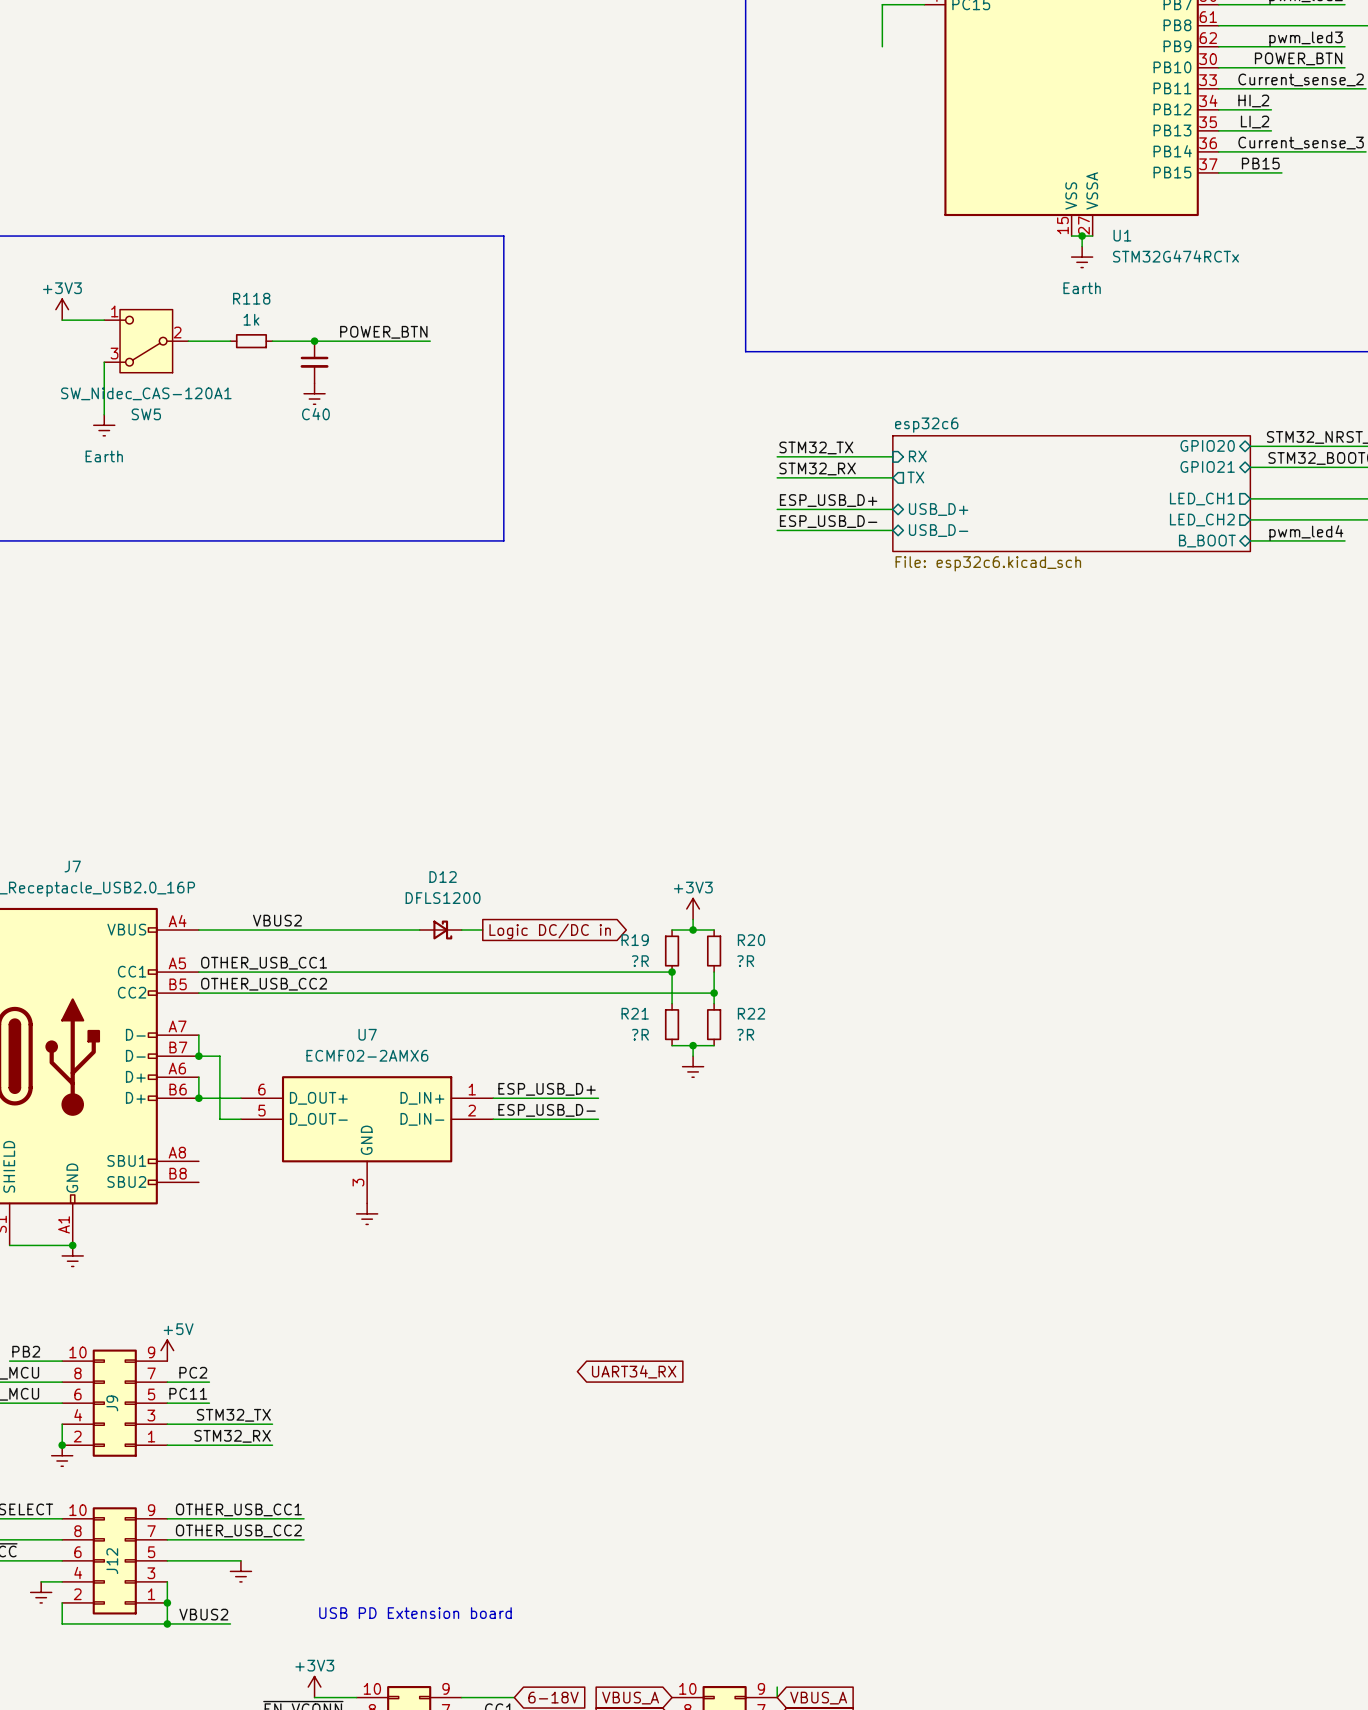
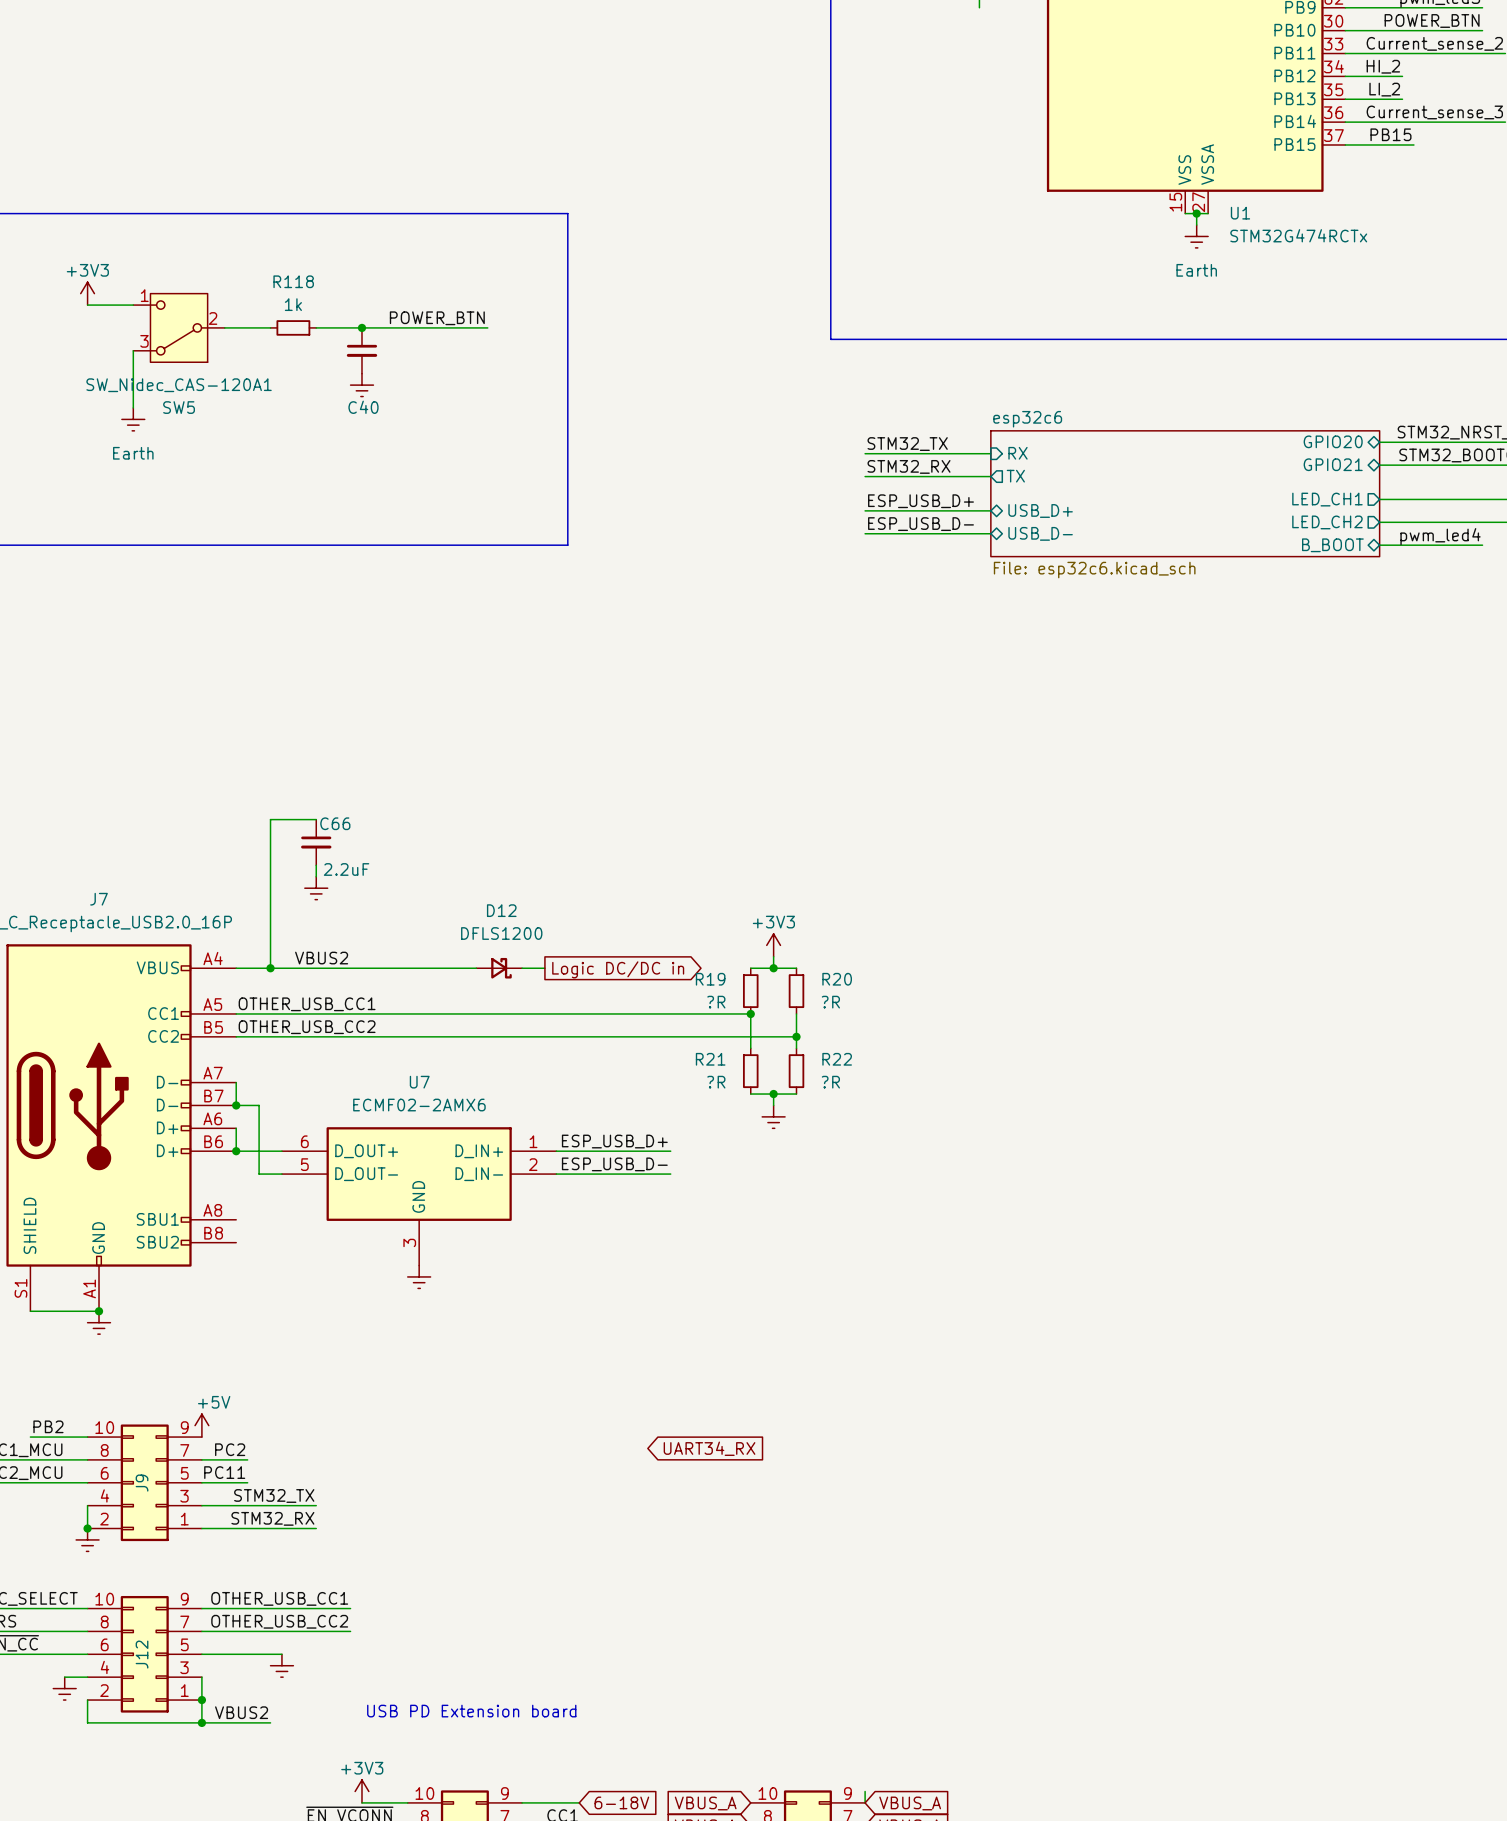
wire: none -> (316, 819) (270, 819) (270, 968)
C66: none -> 2.2uF (316, 842)
wire: none -> (316, 865) (316, 876)
power symbol: none -> (316, 888)
junction: none -> (270, 968)

